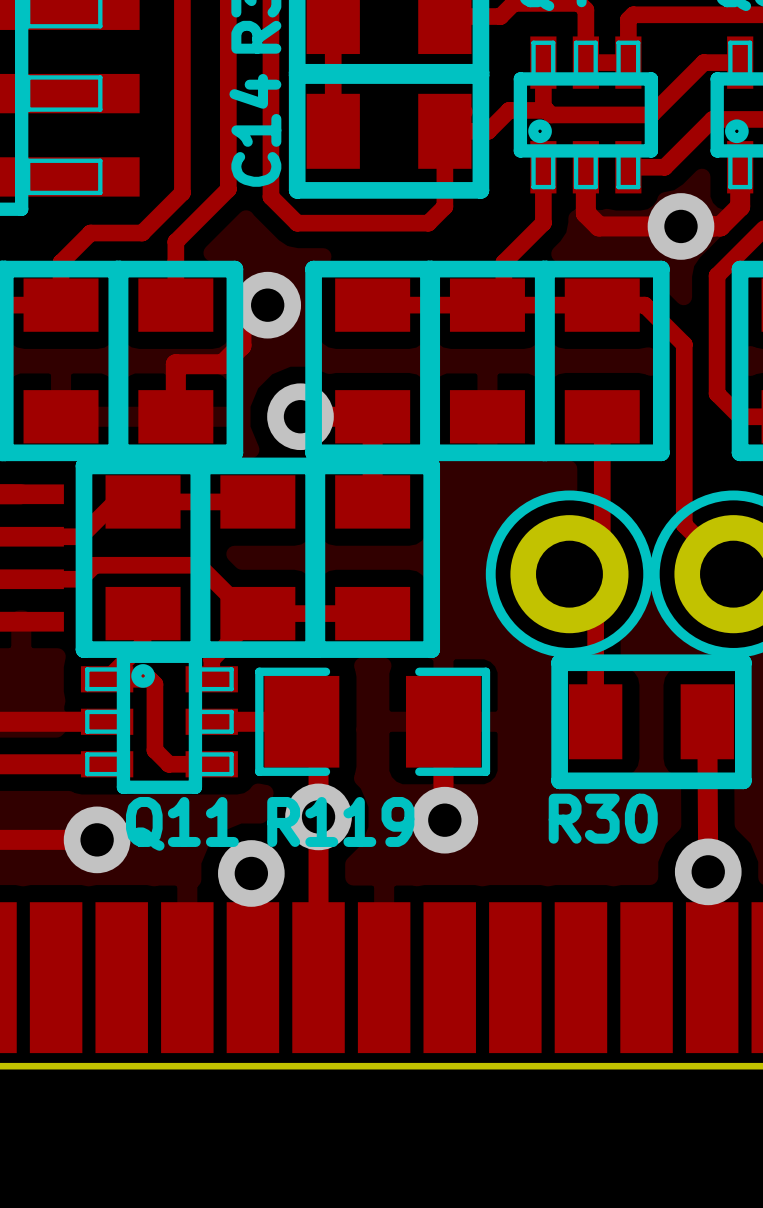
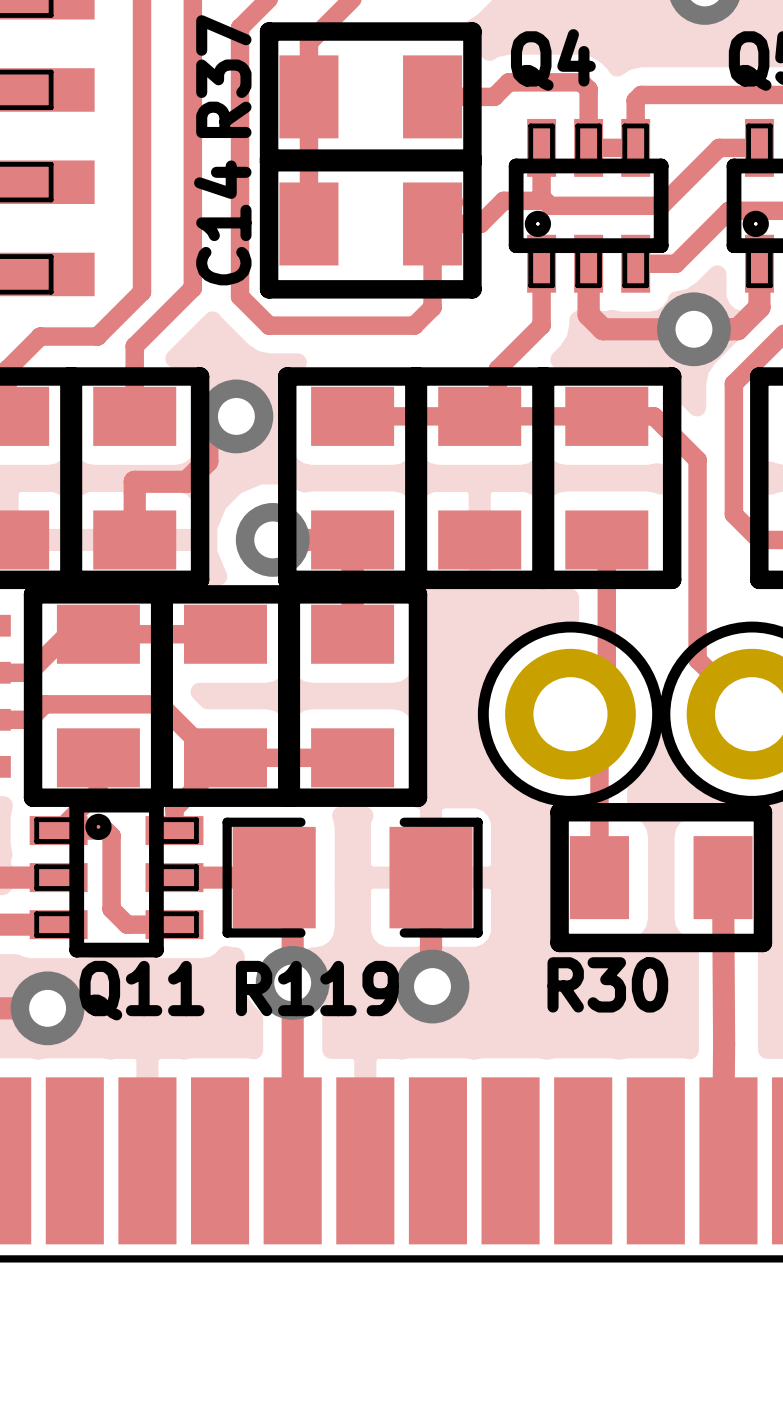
via: (708, 871) -> none
via: (251, 873) -> none

